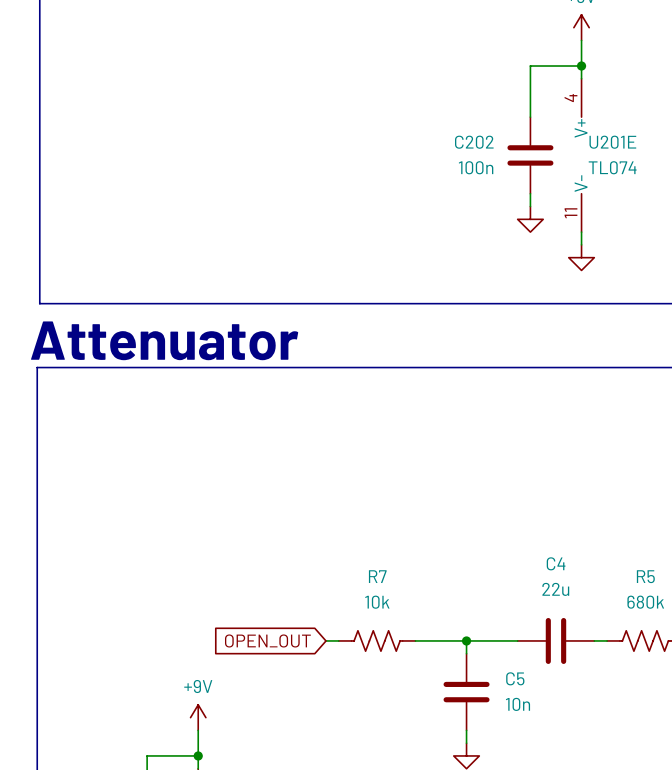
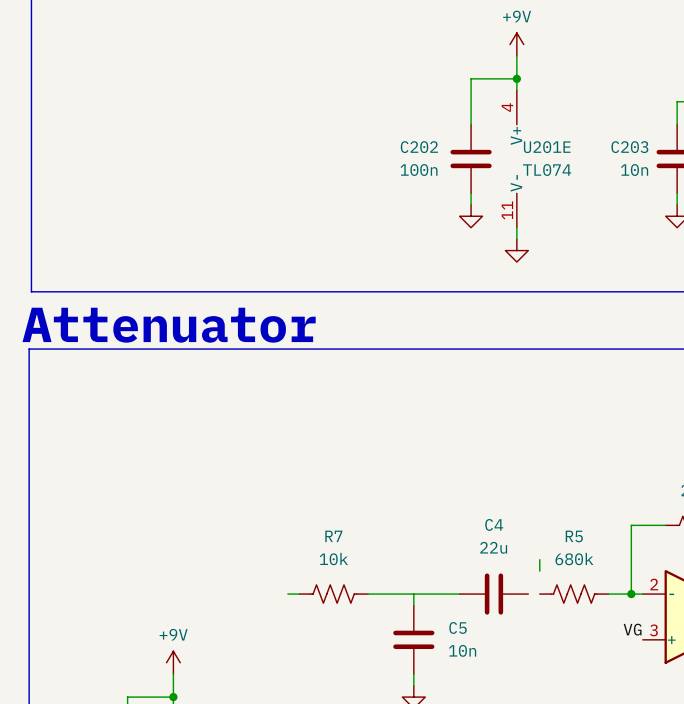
wire: none -> (539, 559) (539, 571)
global label: OPEN_OUT (267, 640) -> none
junction: (466, 640) -> none
wire: (594, 640) (607, 640) -> none

